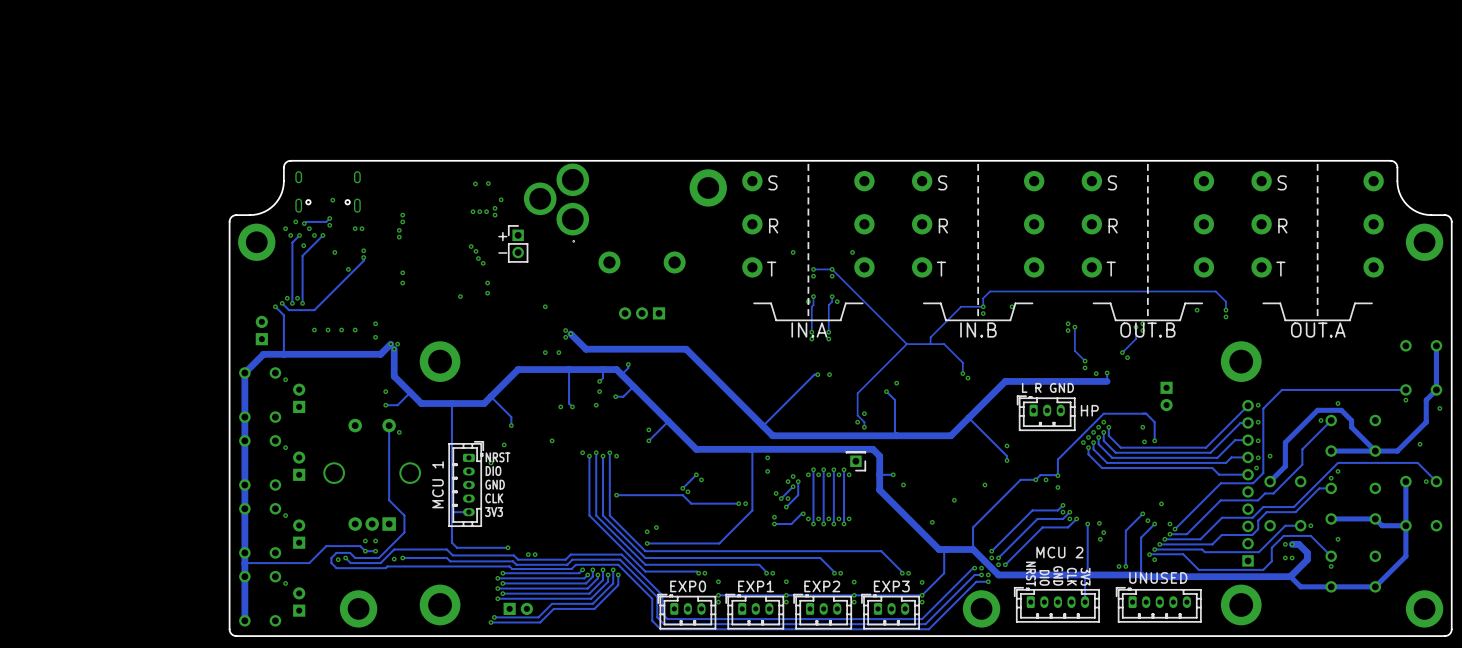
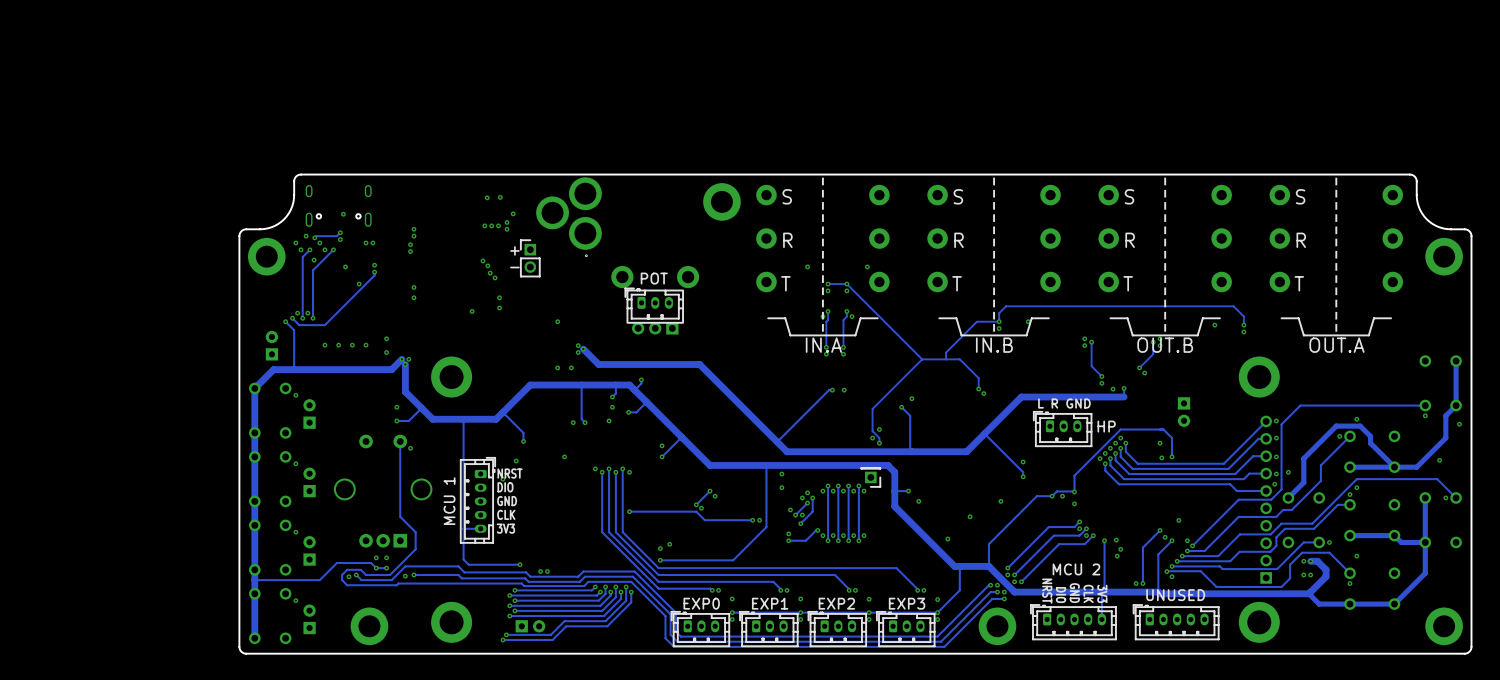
text: none -> POT (654, 278)
part: none -> (654, 305)

